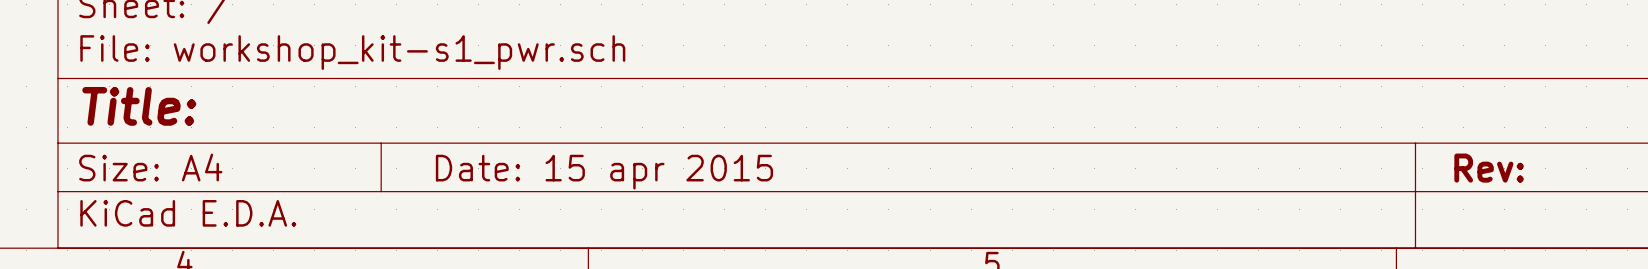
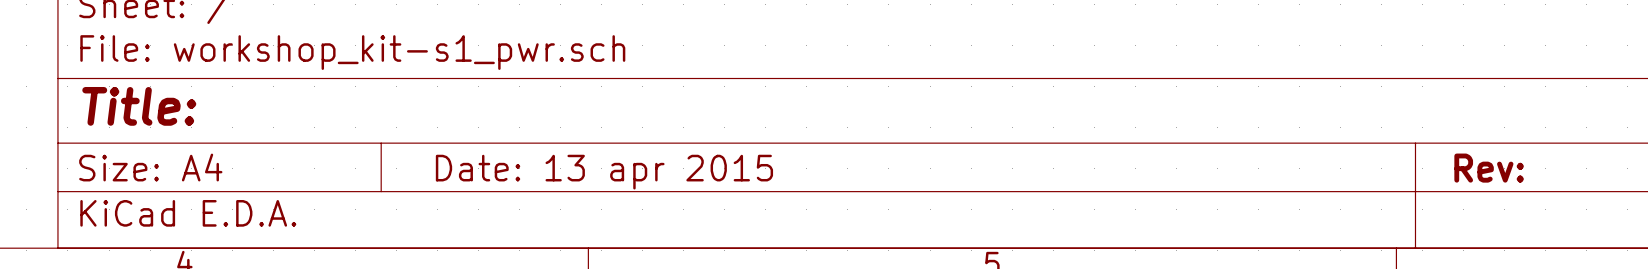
title block: Date: 15 apr 2015 (604, 172) -> Date: 13 apr 2015 (604, 172)

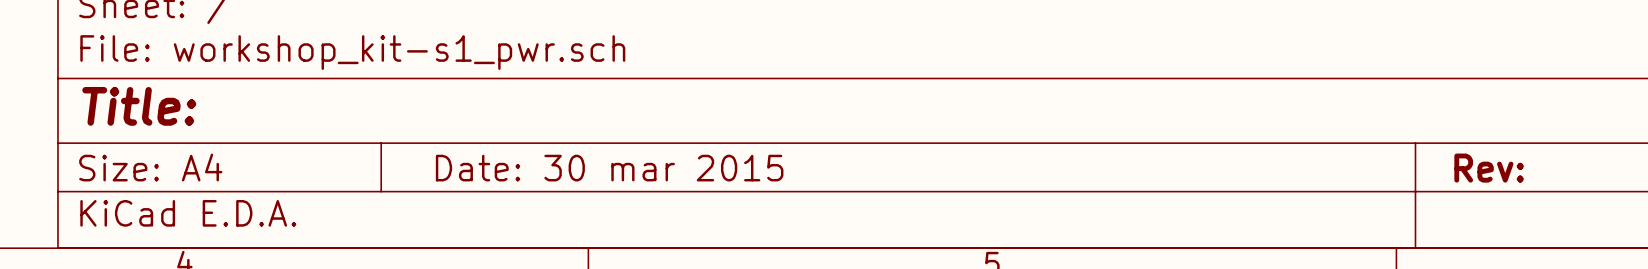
title block: Date: 13 apr 2015 (604, 172) -> Date: 30 mar 2015 (609, 168)

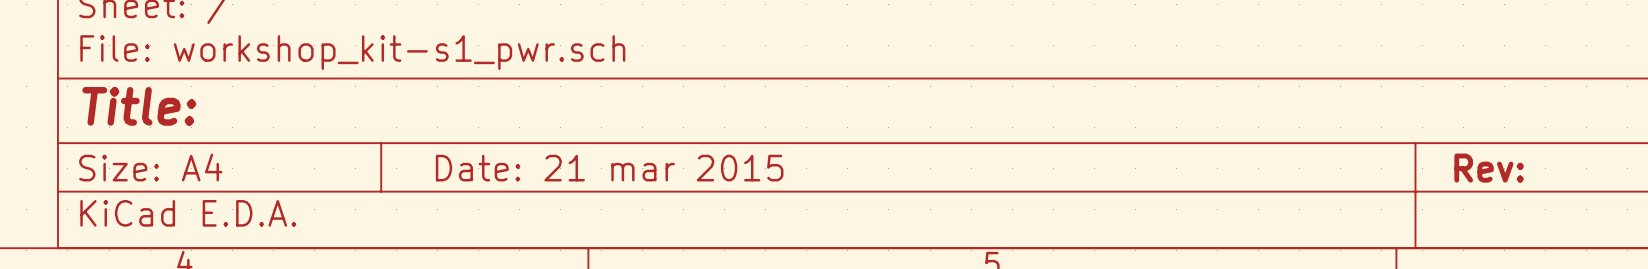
title block: Date: 30 mar 2015 (609, 168) -> Date: 21 mar 2015 (609, 168)

